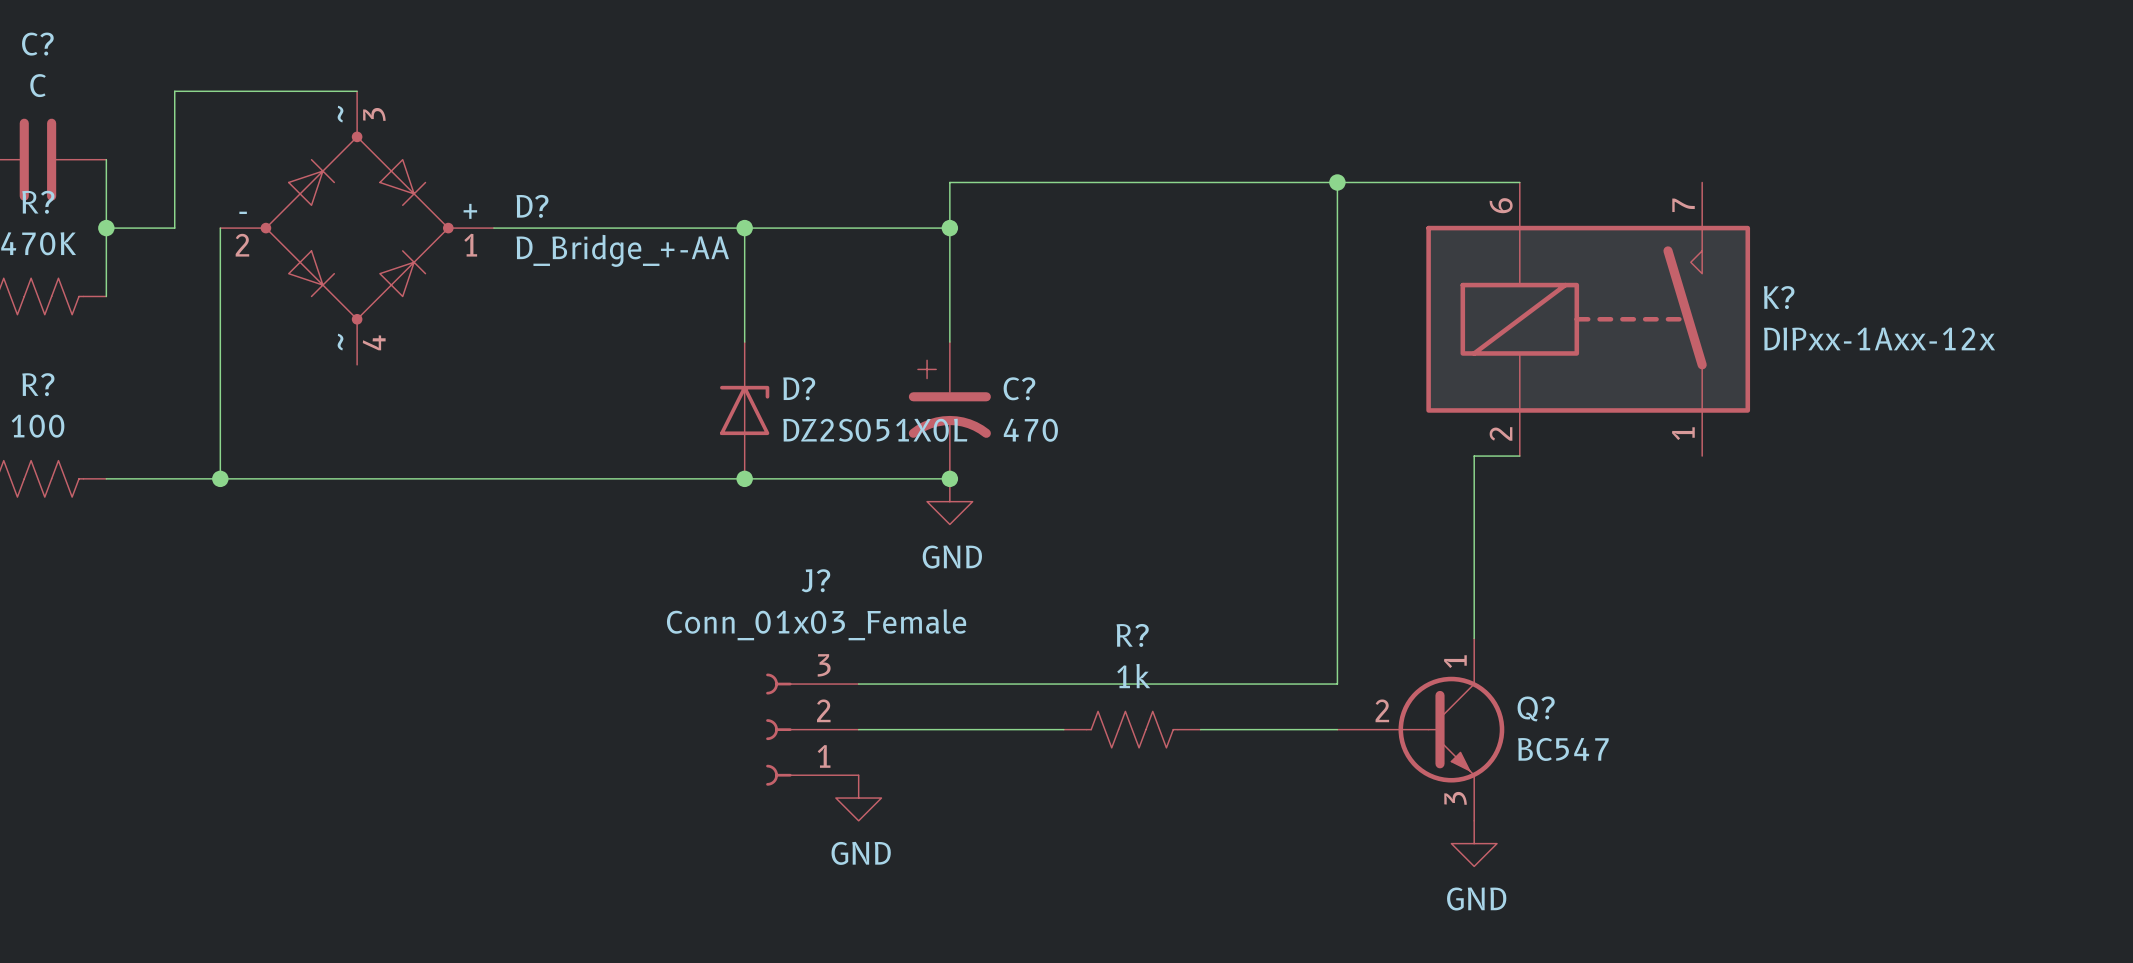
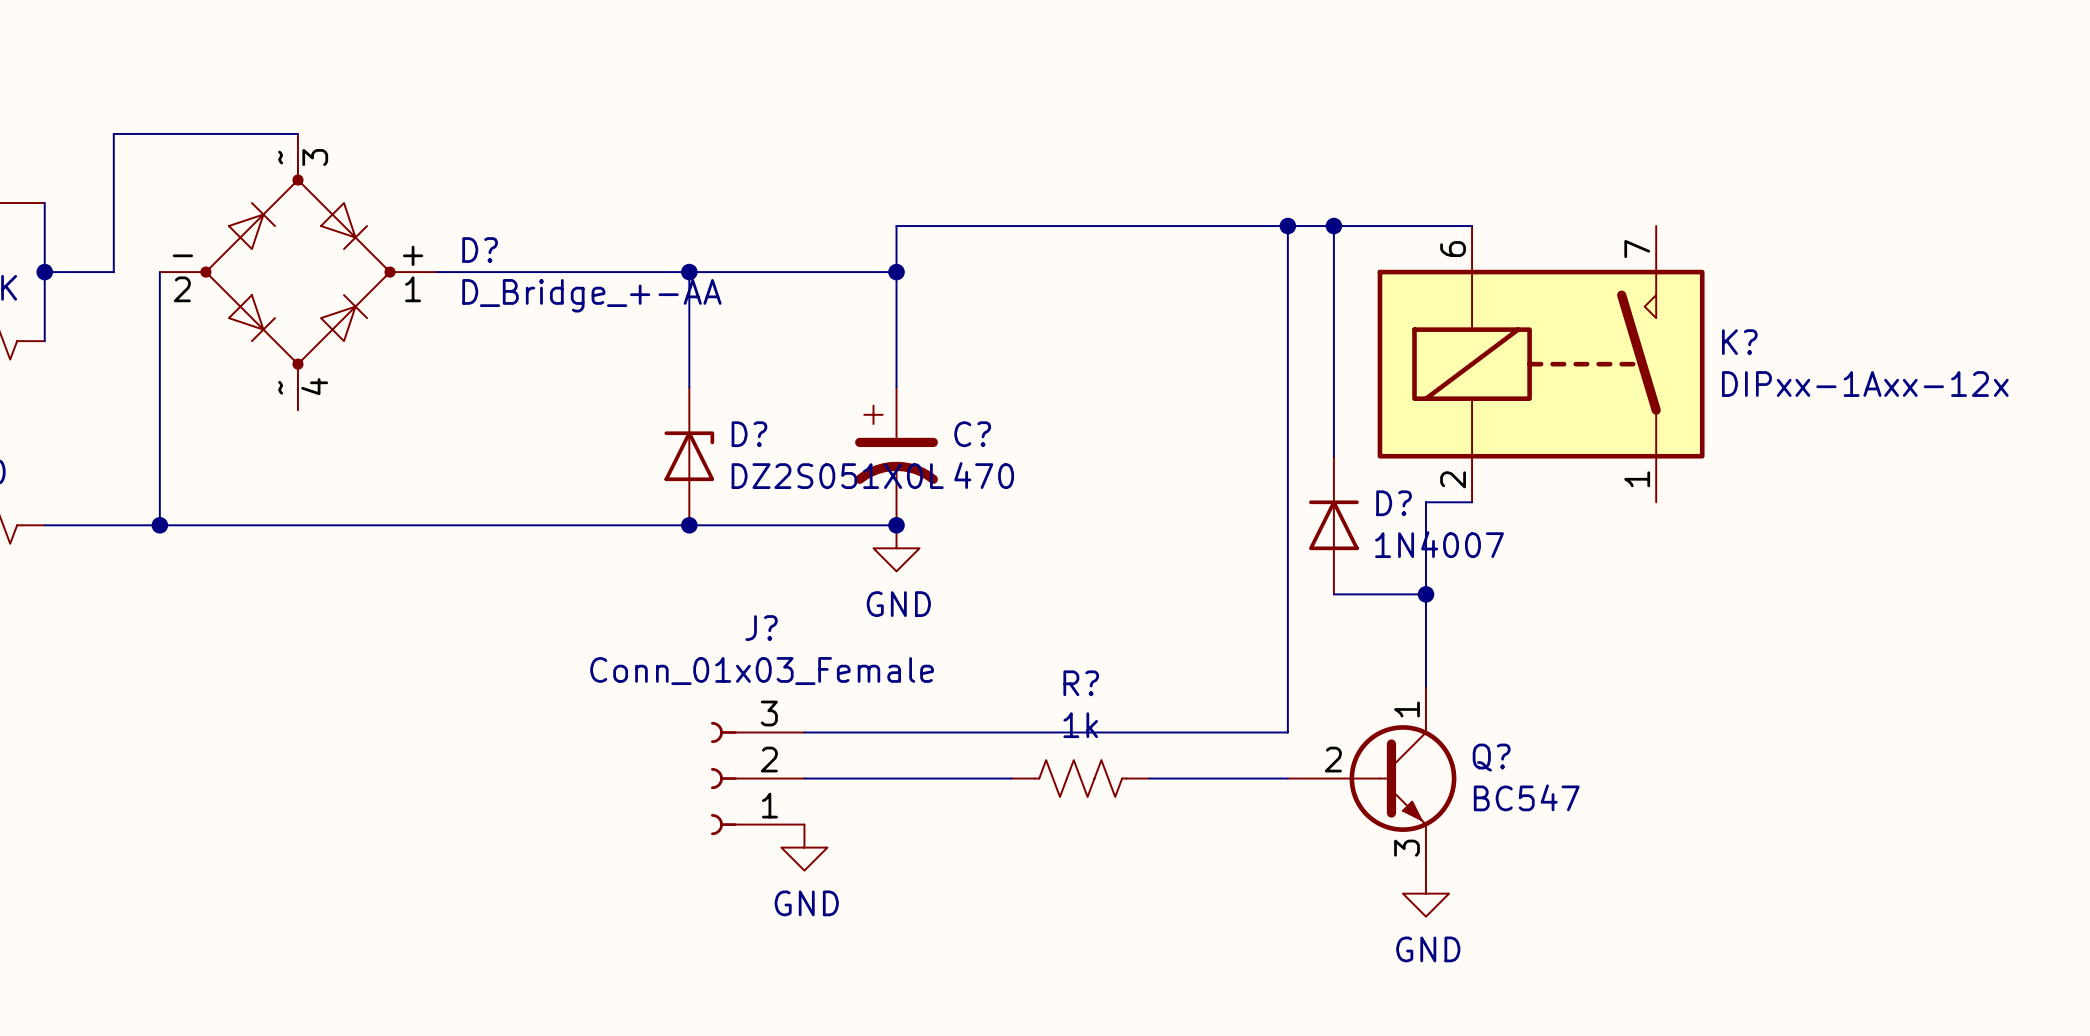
wire: none -> (1333, 226) (1333, 456)
junction: none -> (1333, 226)
D?: none -> 1N4007 (1333, 525)
wire: none -> (1333, 594) (1425, 594)
junction: none -> (1425, 594)

